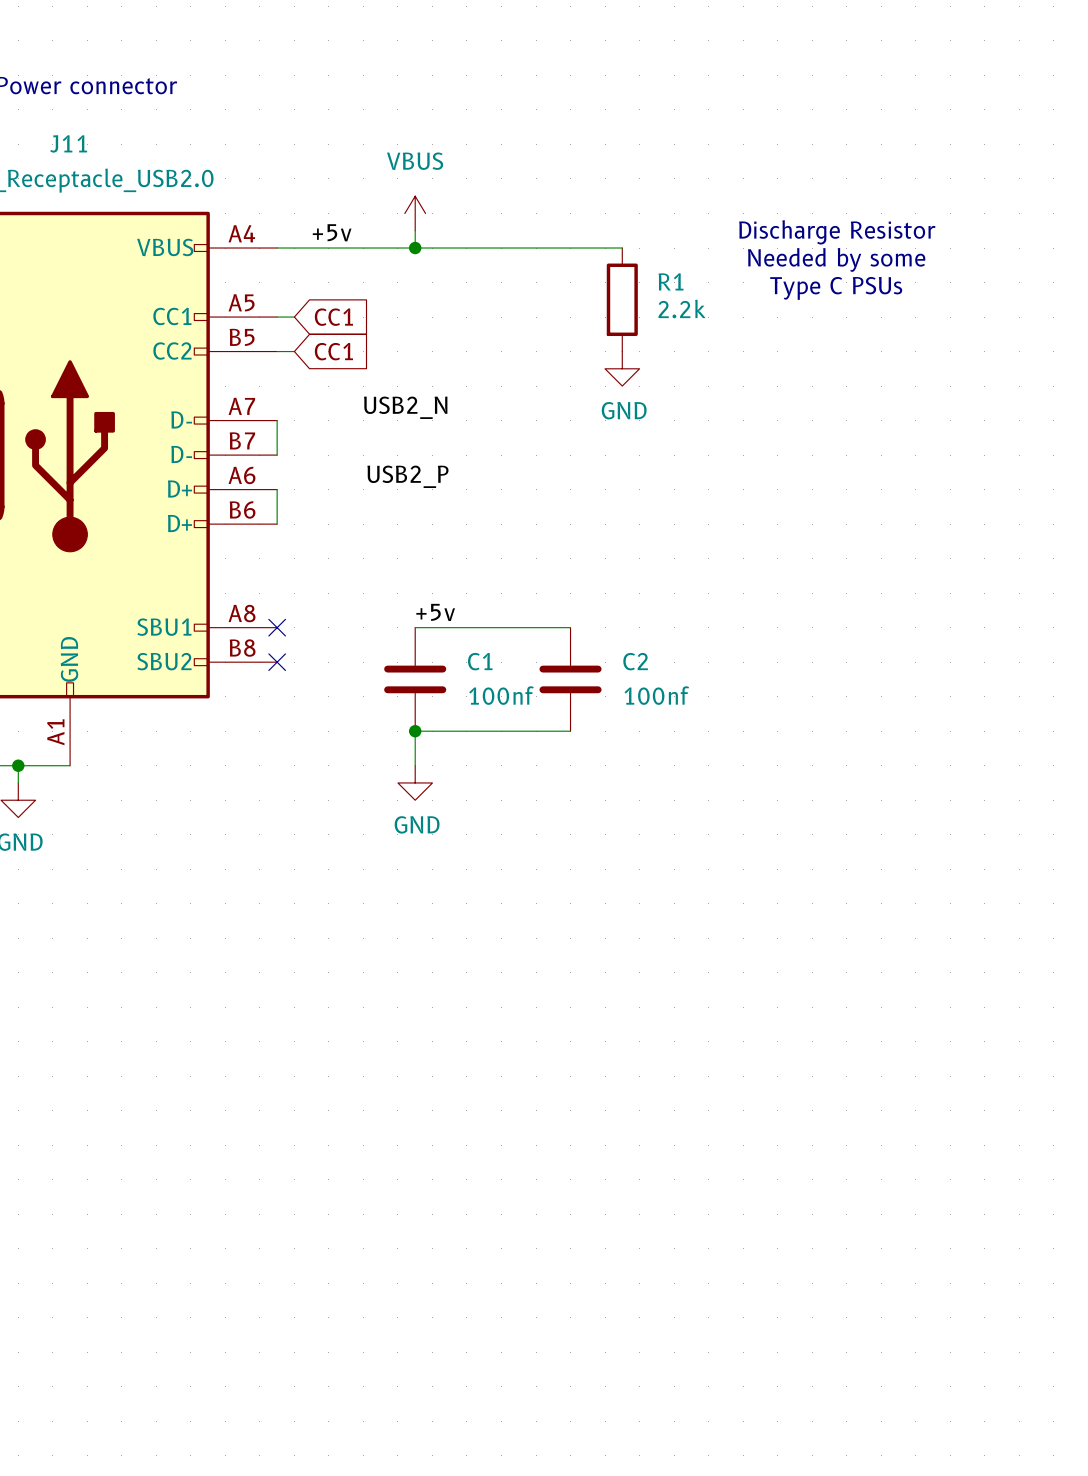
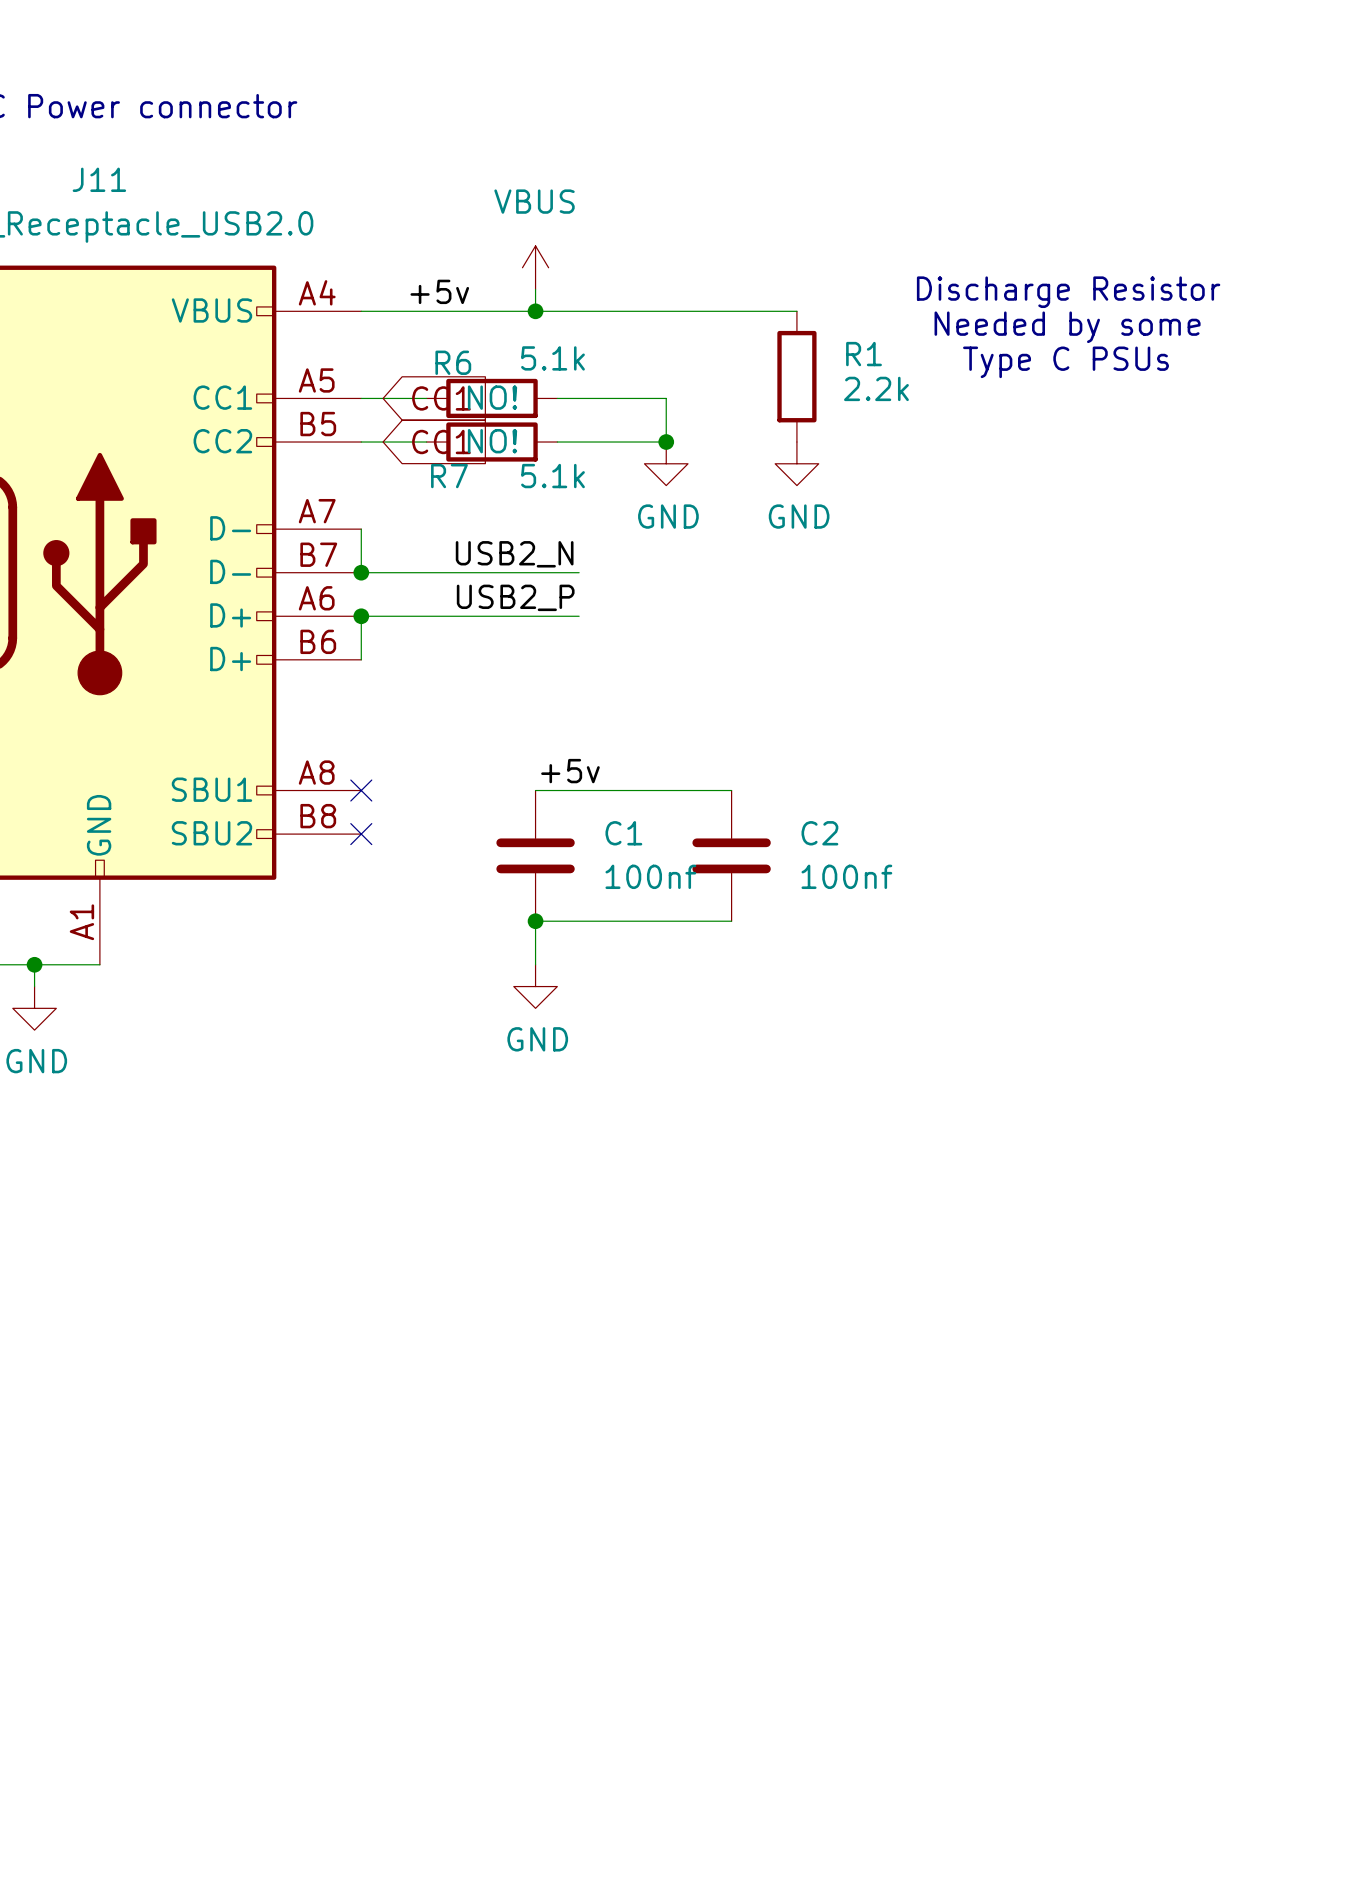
wire: none -> (383, 398) (426, 398)
R6: none -> 5.1k (491, 398)
wire: none -> (557, 398) (666, 398) (666, 442) (557, 442)
wire: none -> (383, 442) (426, 442)
R7: none -> 5.1k (491, 442)
junction: none -> (666, 442)
power symbol: none -> GND (666, 463)
label position: USB2_N (405, 407) -> USB2_N (514, 554)
wire: none -> (361, 572) (579, 572)
junction: none -> (361, 572)
wire: none -> (361, 616) (579, 616)
junction: none -> (361, 616)

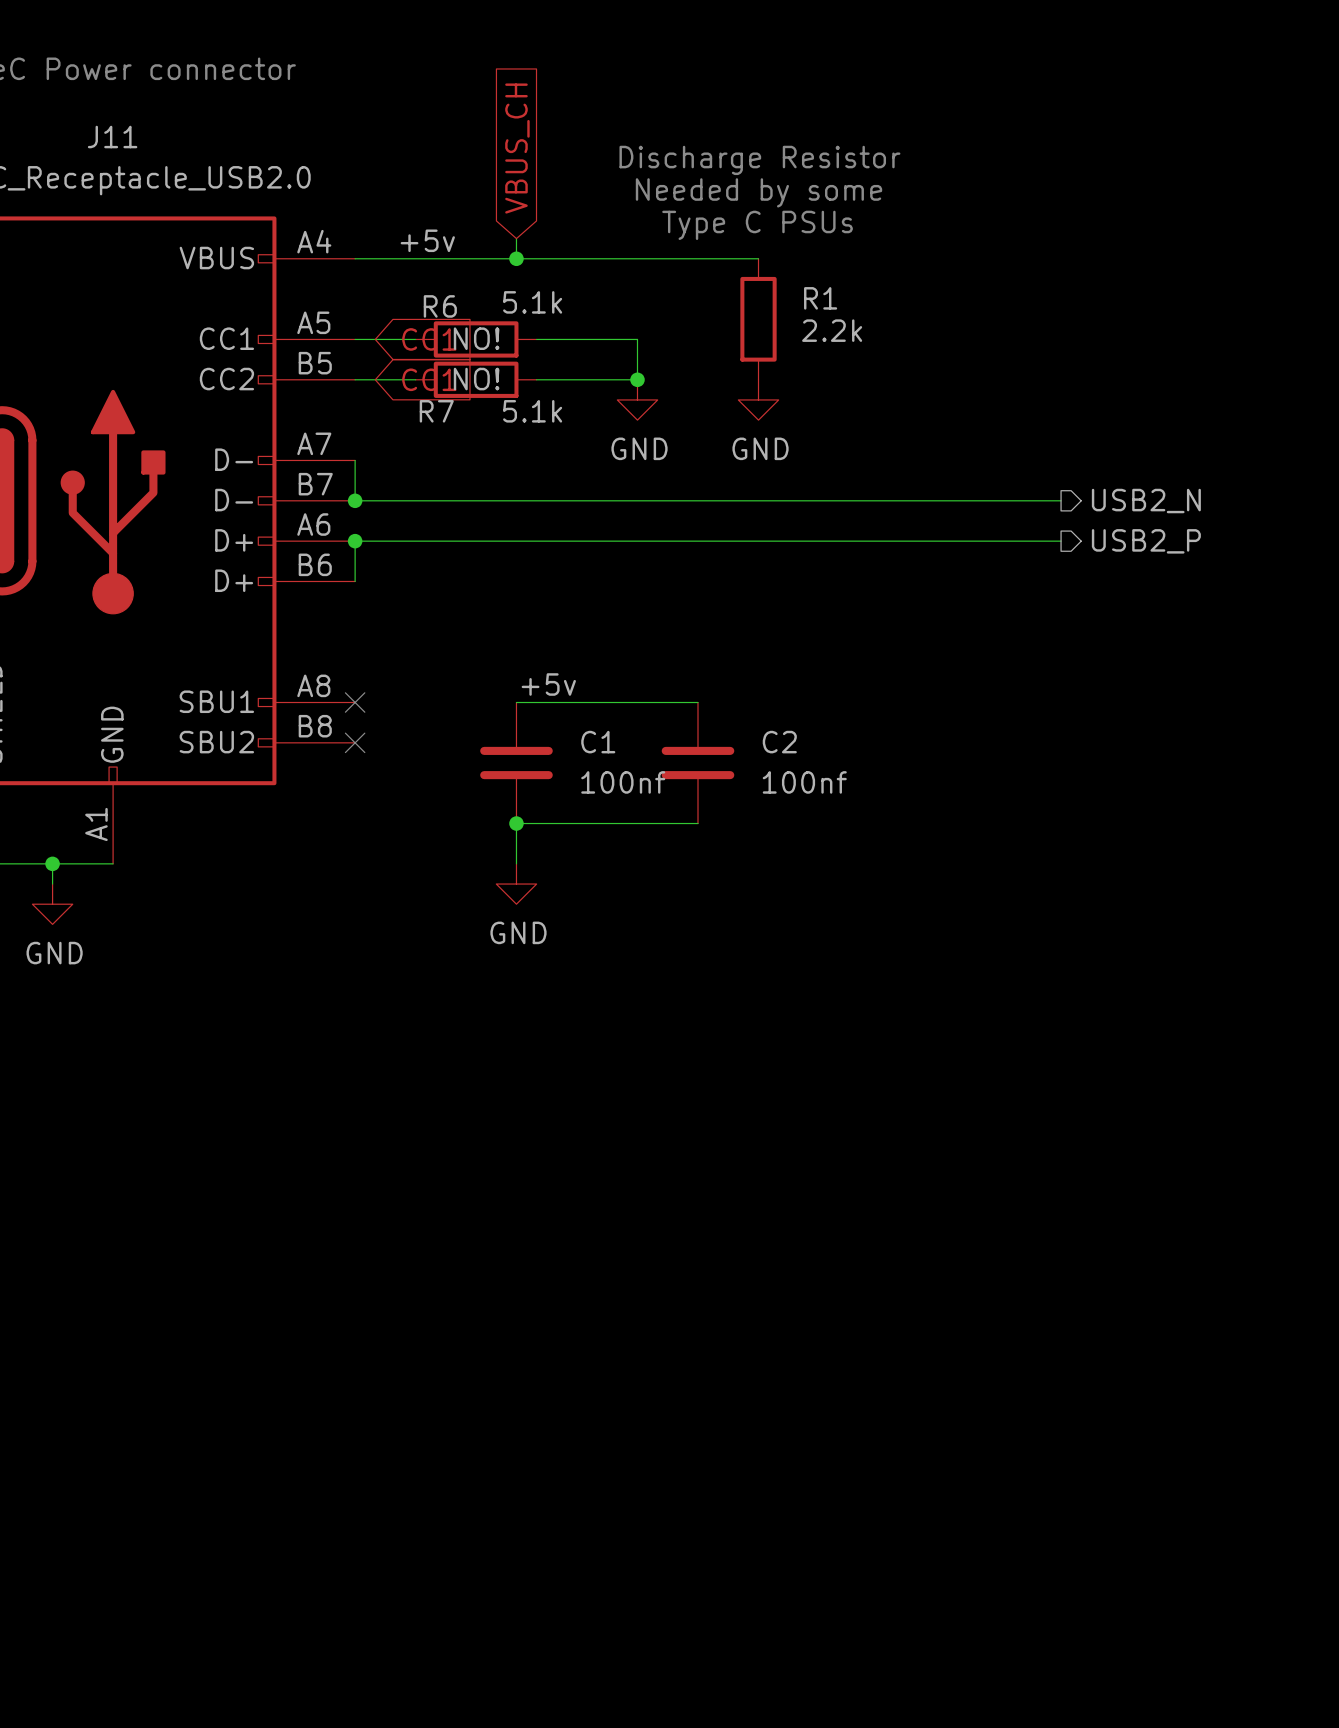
global label: none -> VBUS_CH (517, 148)
power symbol: VBUS (535, 267) -> none
text position: Discharge Resistor (1068, 292) -> Discharge Resistor (759, 160)
text position: Needed by some (1067, 327) -> Needed by some (758, 192)
text position: Type C PSUs (1066, 362) -> Type C PSUs (757, 225)
label: USB2_N (514, 554) -> none
wire: none -> (556, 500) (1061, 500)
sheet pin: none -> USB2_N (1146, 501)
label: USB2_P (515, 597) -> none
wire: none -> (556, 541) (1061, 541)
sheet pin: none -> USB2_P (1146, 541)

